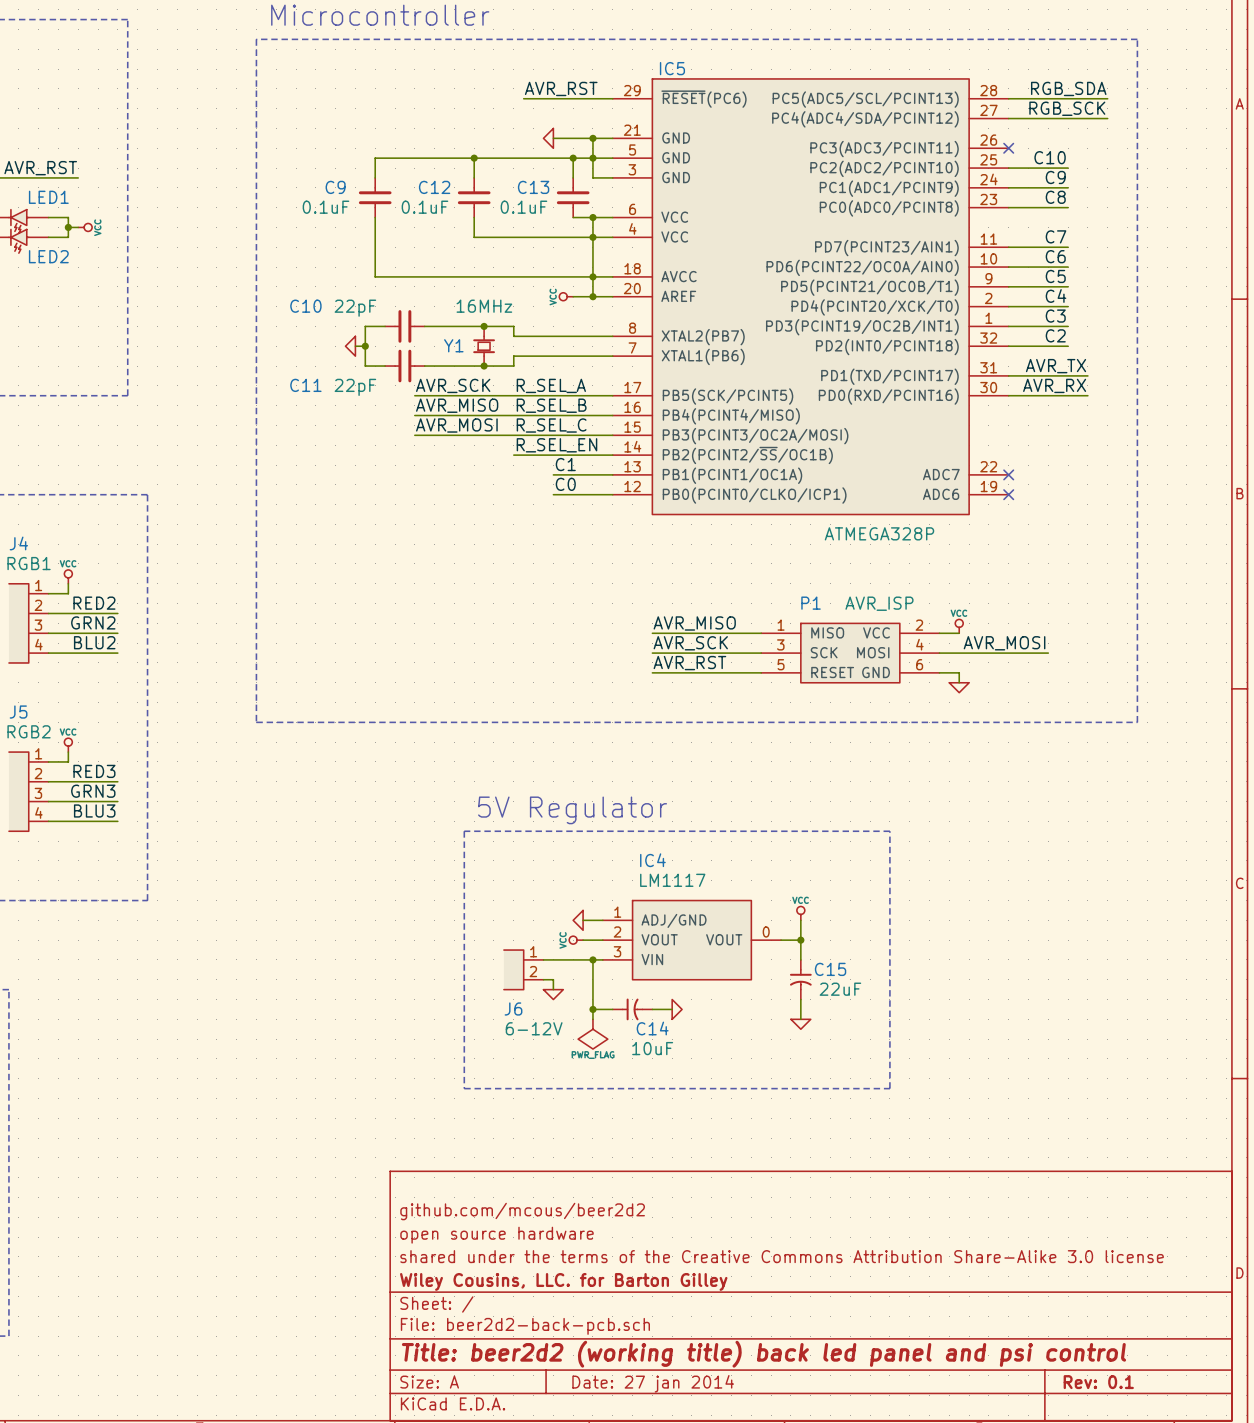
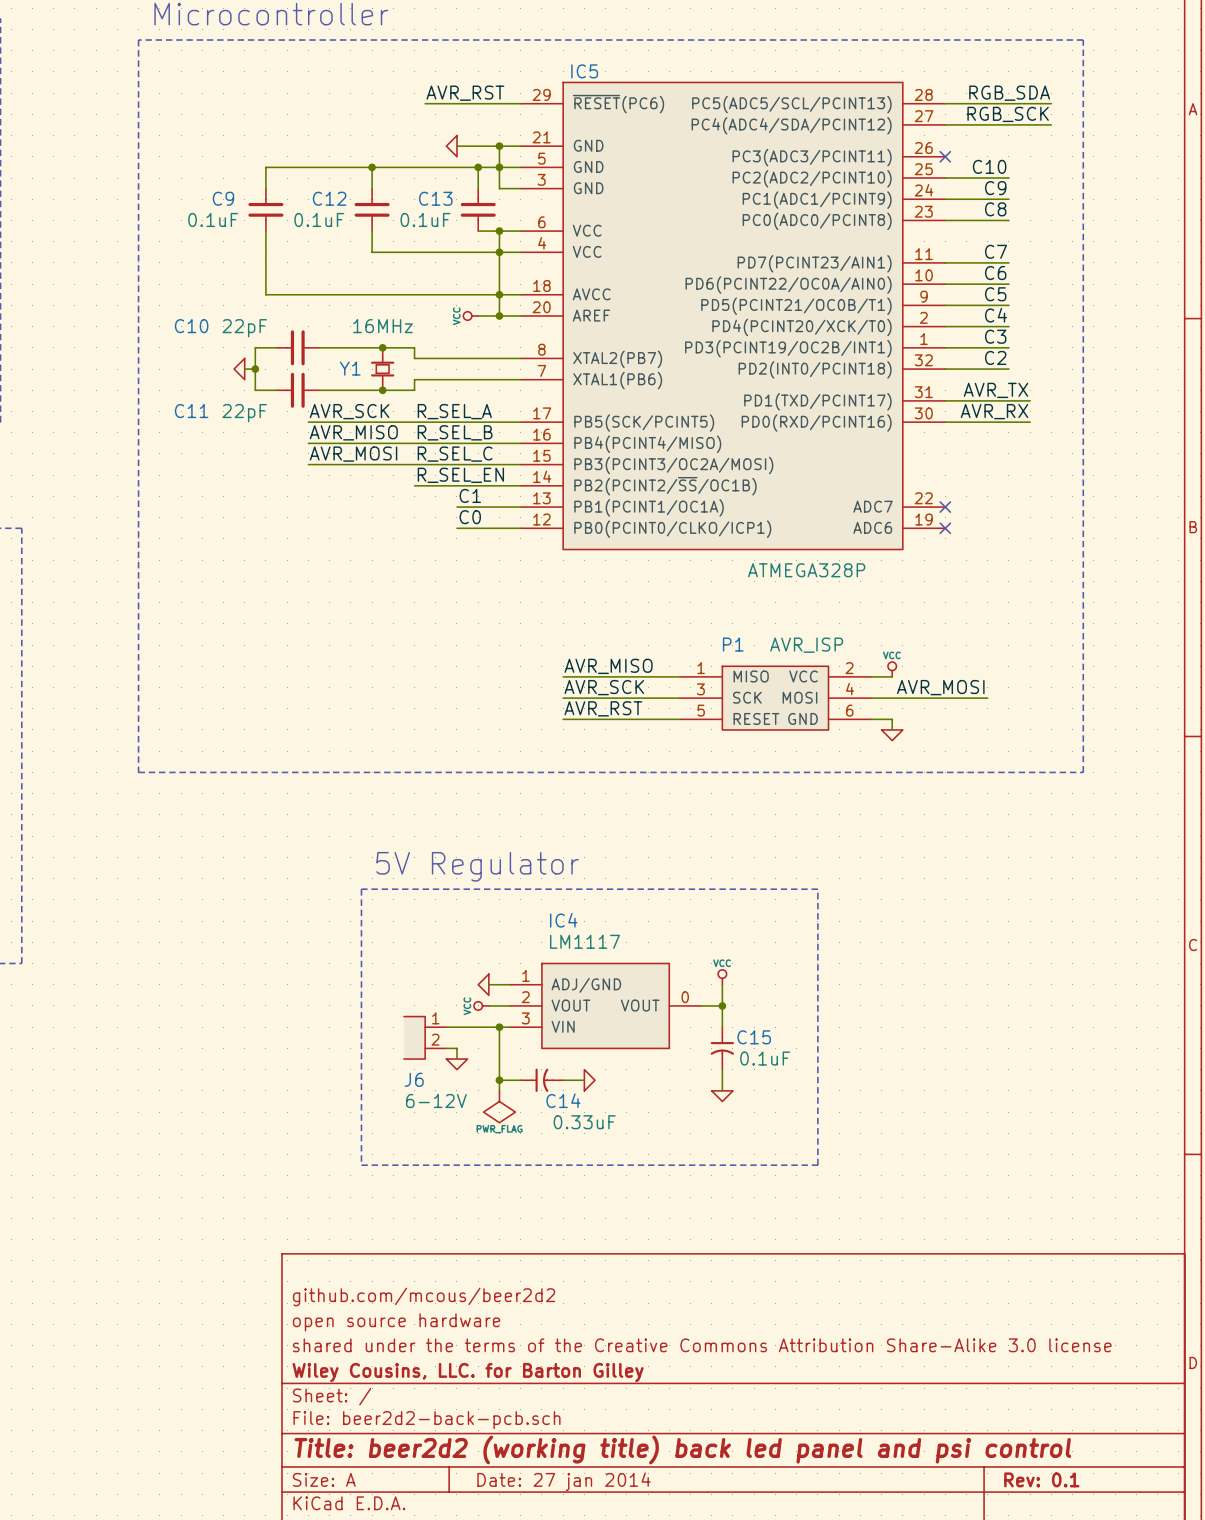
C15 value: 22uF (840, 989) -> 0.1uF (765, 1058)
C14 value: 10uF (652, 1048) -> 0.33uF (584, 1122)

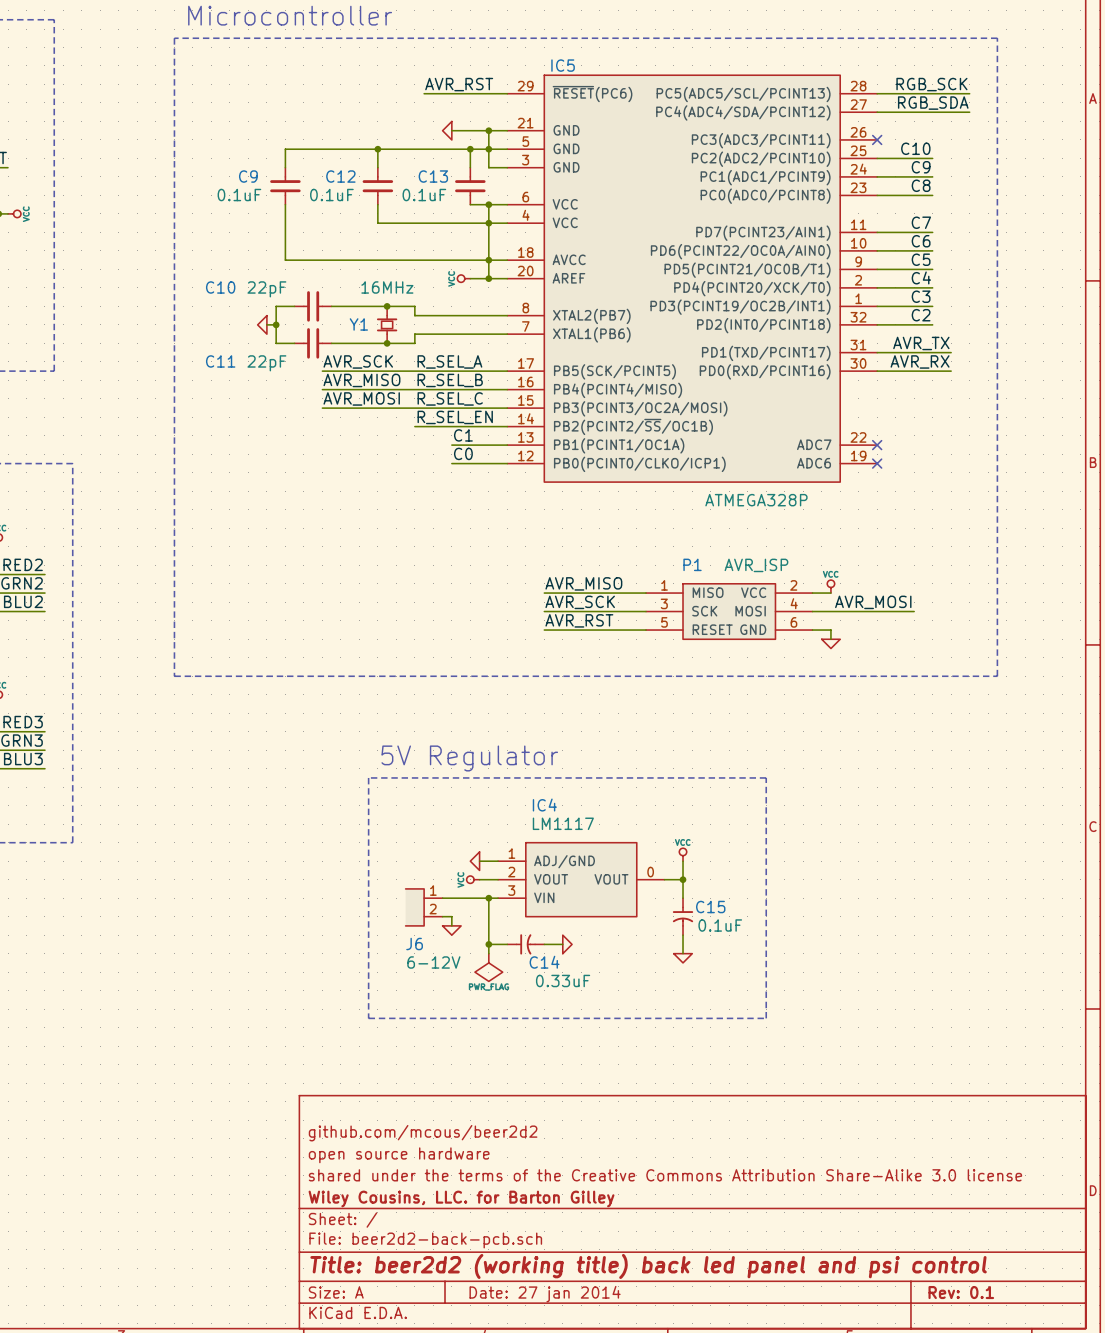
label: RGB_SDA (1009, 93) -> RGB_SCK (931, 84)
label: RGB_SCK (1008, 114) -> RGB_SDA (933, 103)

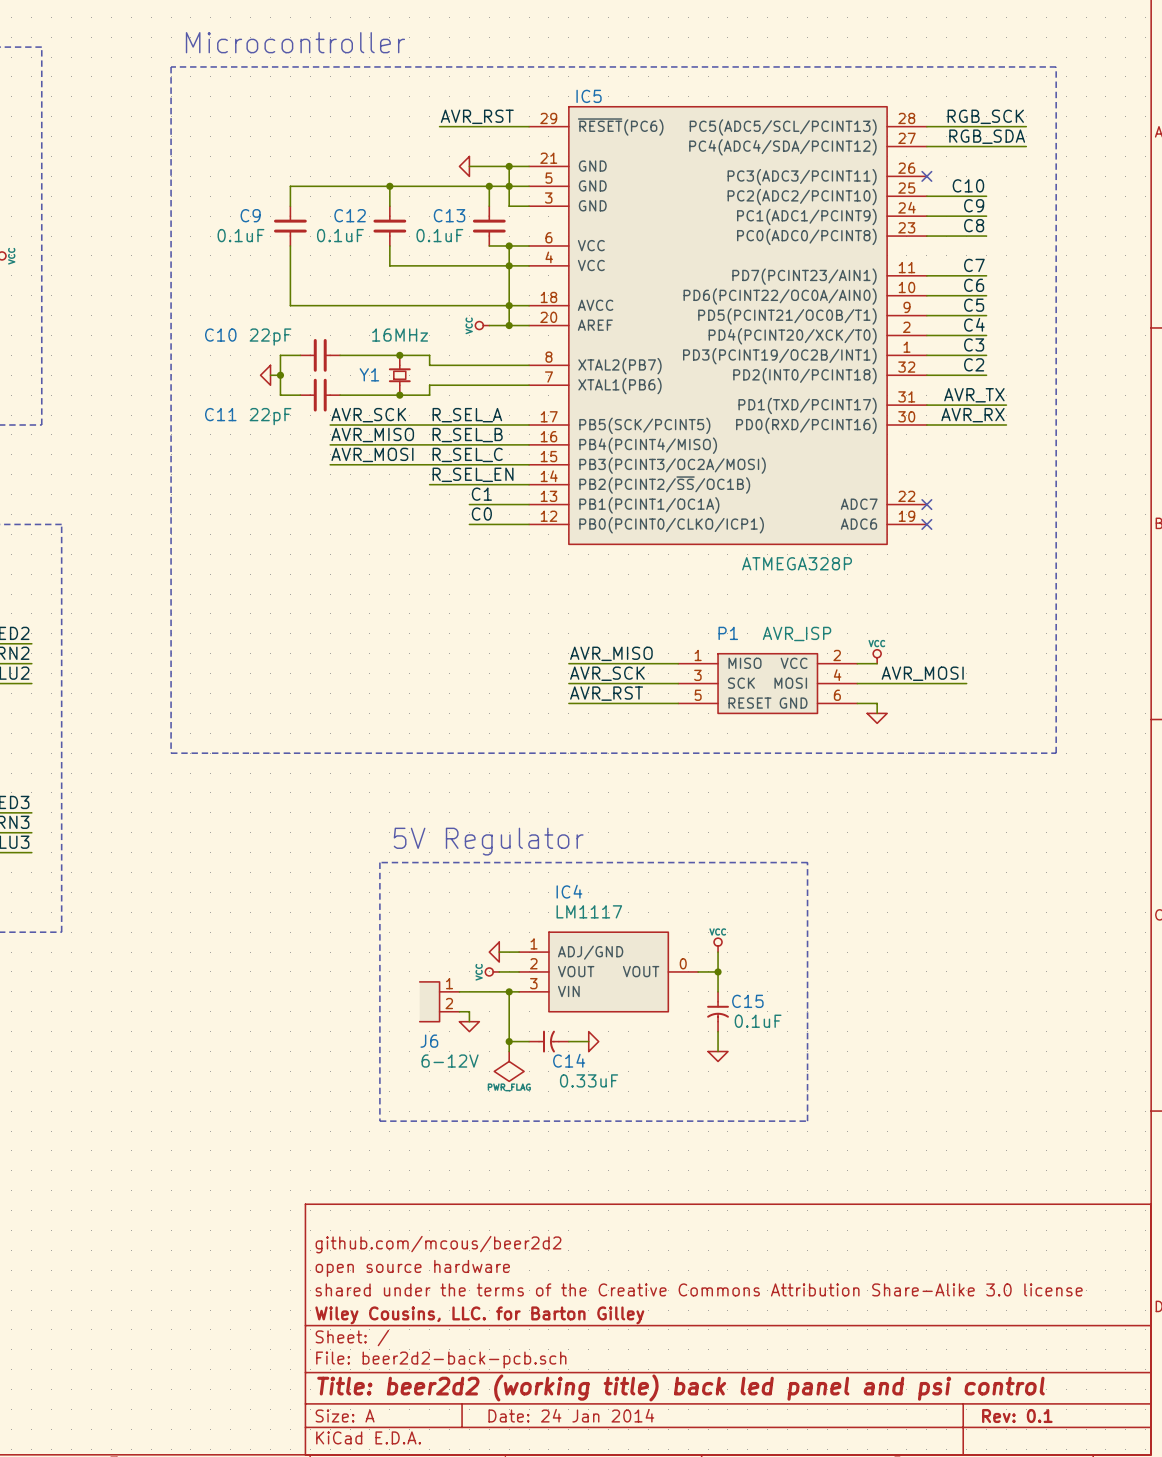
title block: Date: 27 jan 2014 (545, 1294) -> Date: 24 Jan 2014 (571, 1415)

